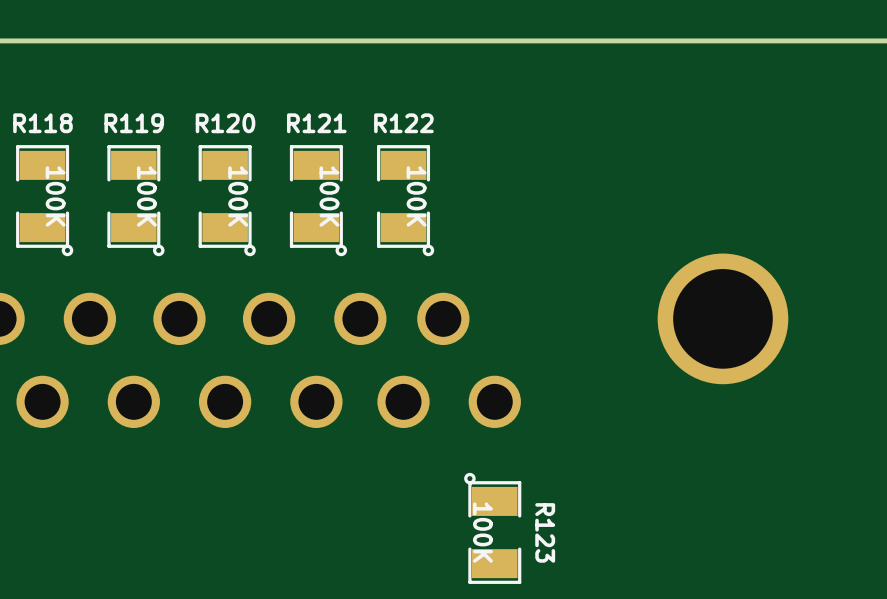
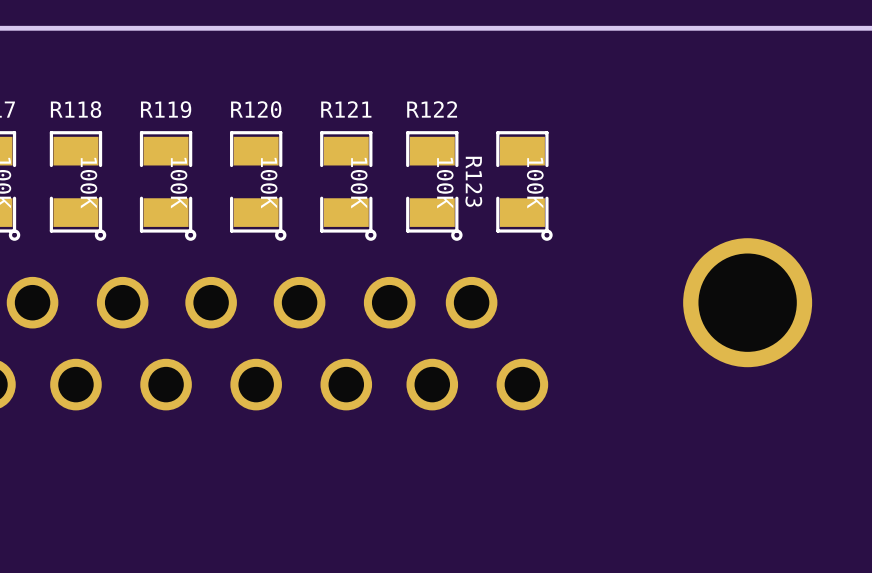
R123 rotation: 0° (492, 528) -> 180° (524, 185)
R123 position: (492, 528) -> (524, 185)

